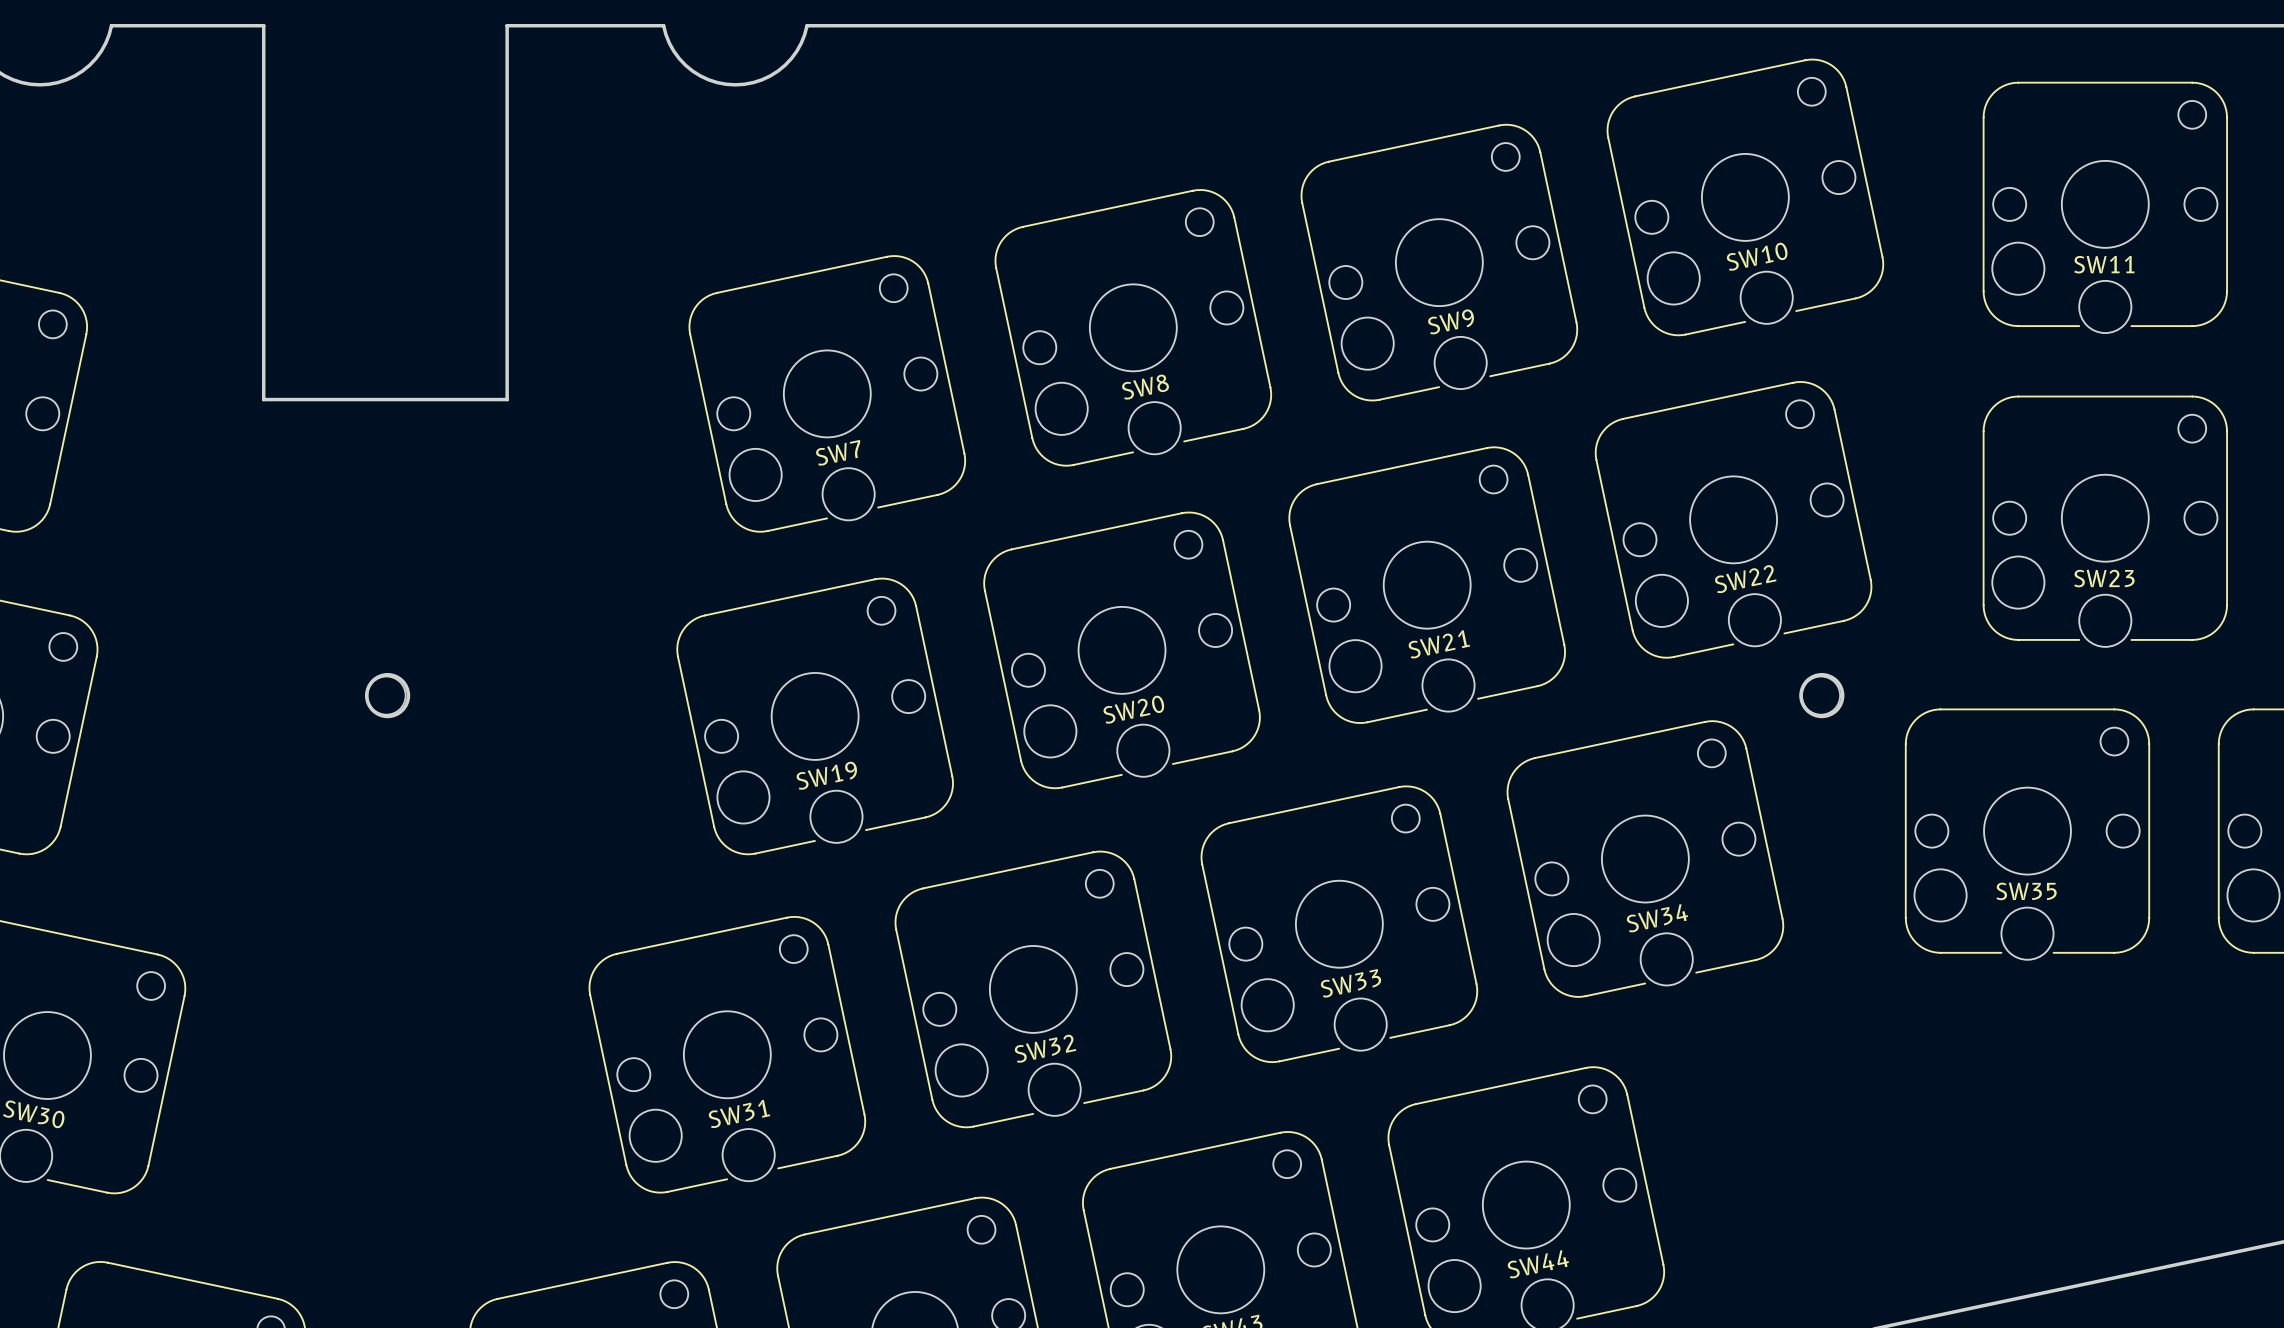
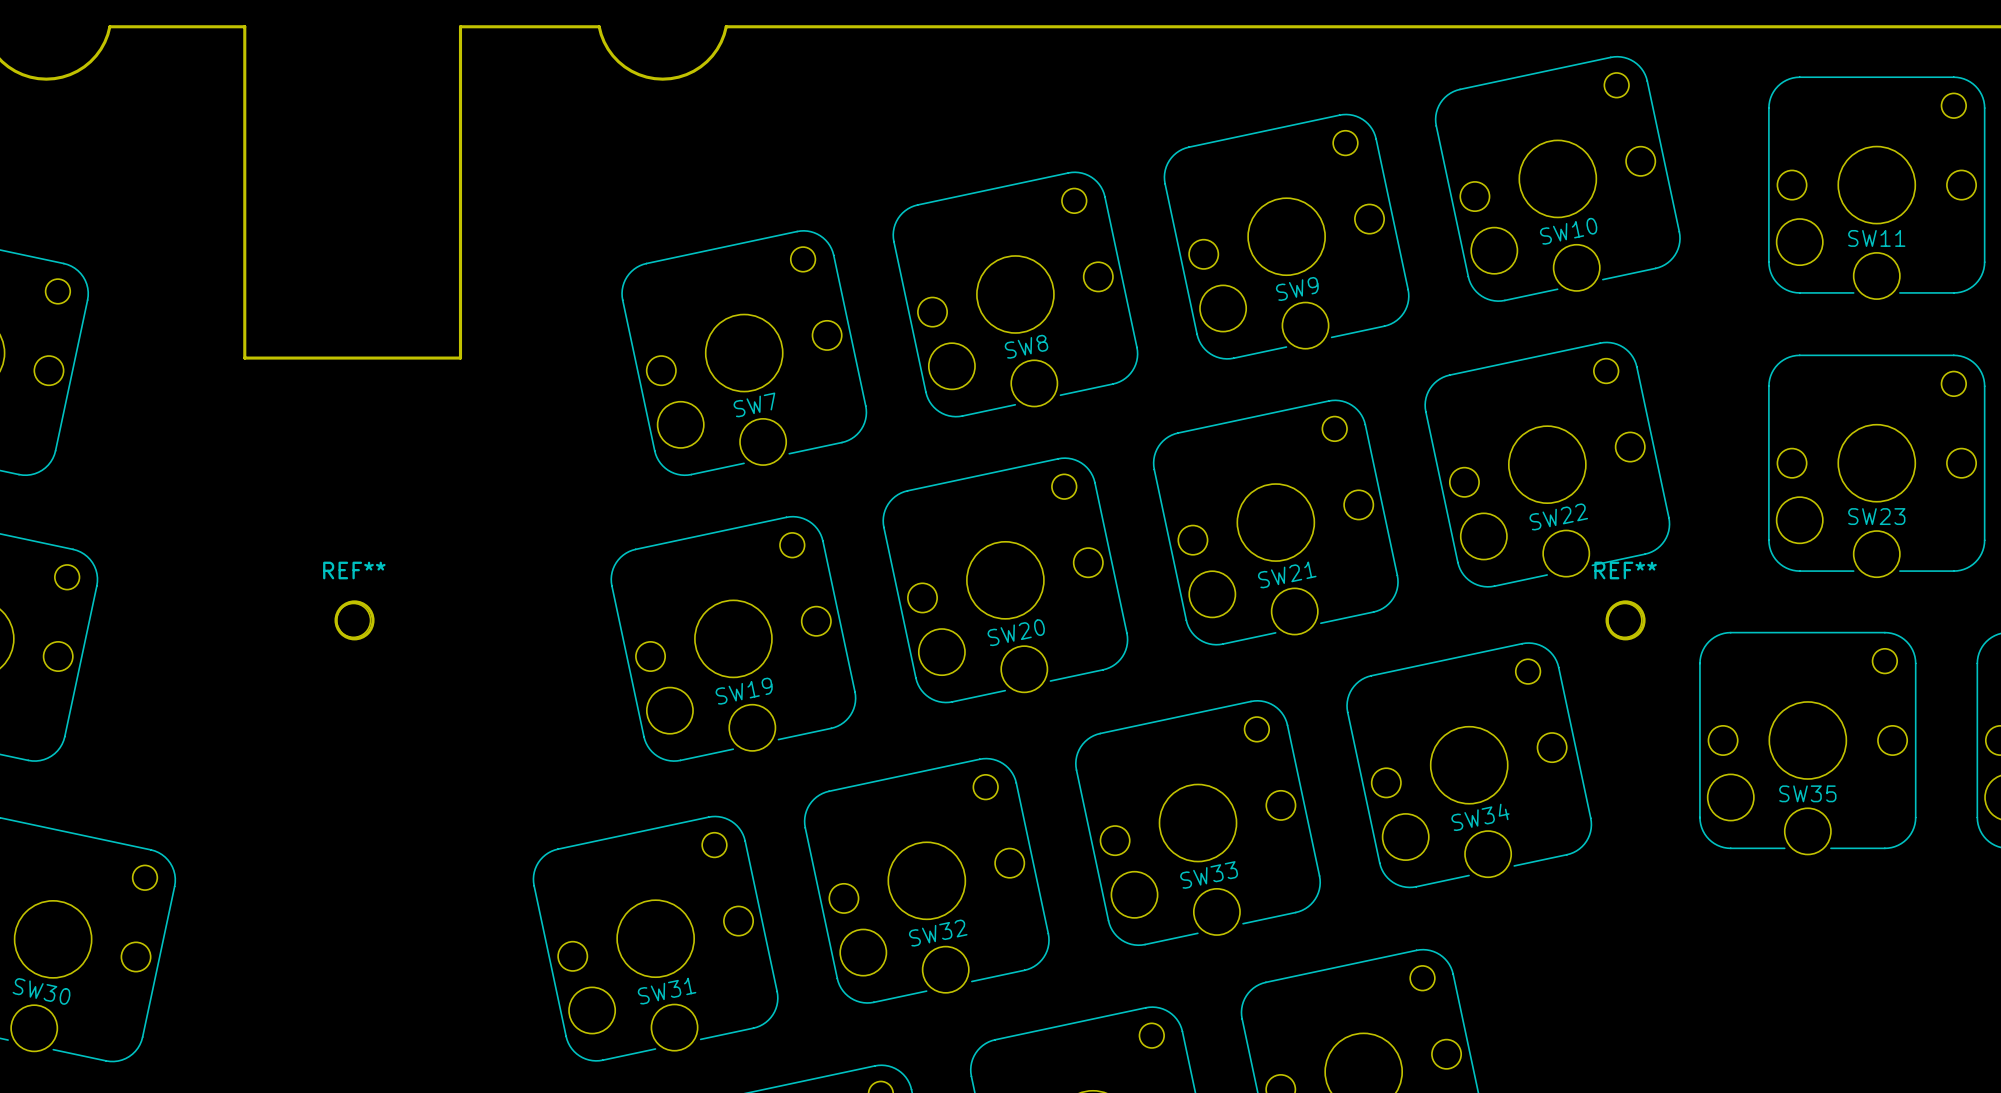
REF** name: none -> REF** (354, 570)
REF** name: none -> REF** (1625, 570)

